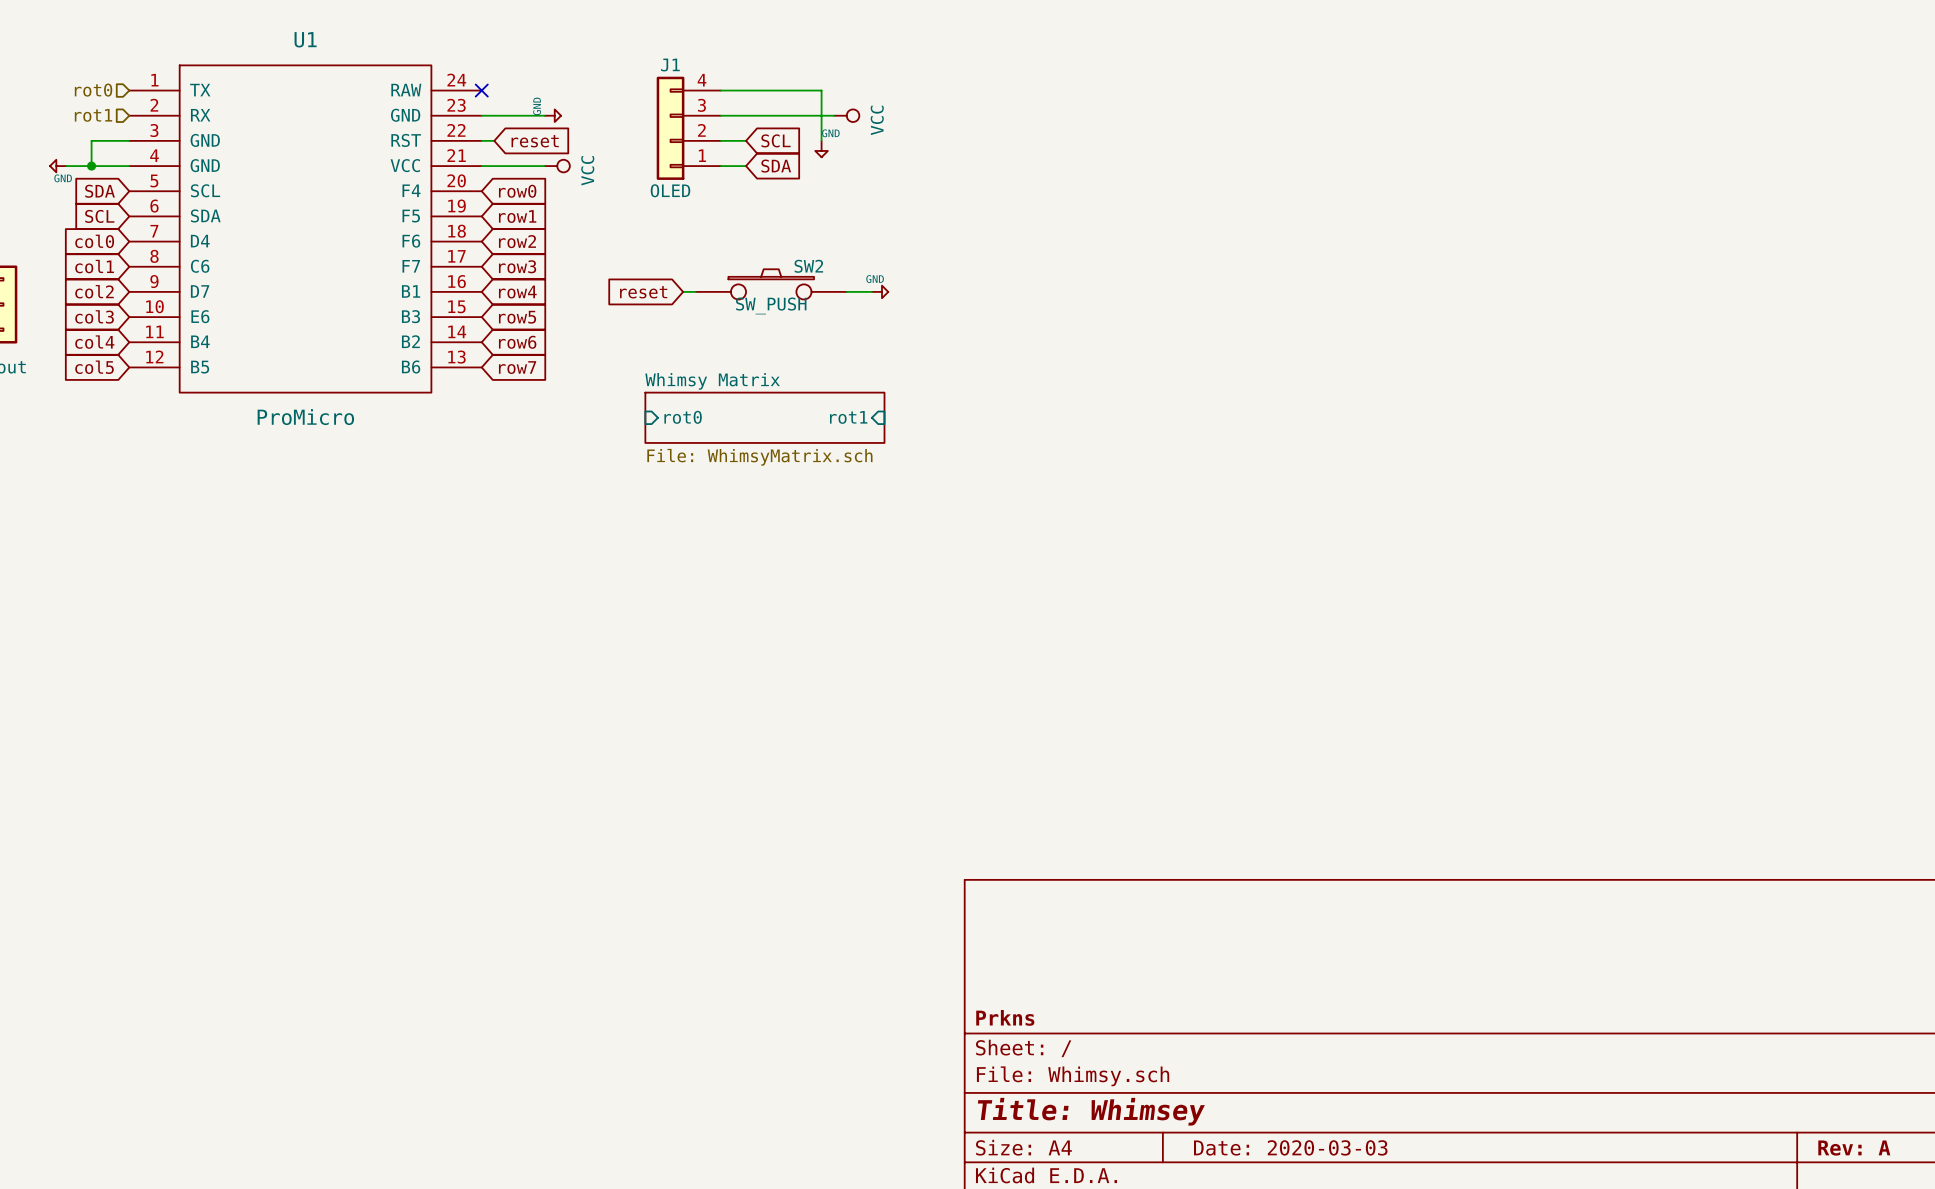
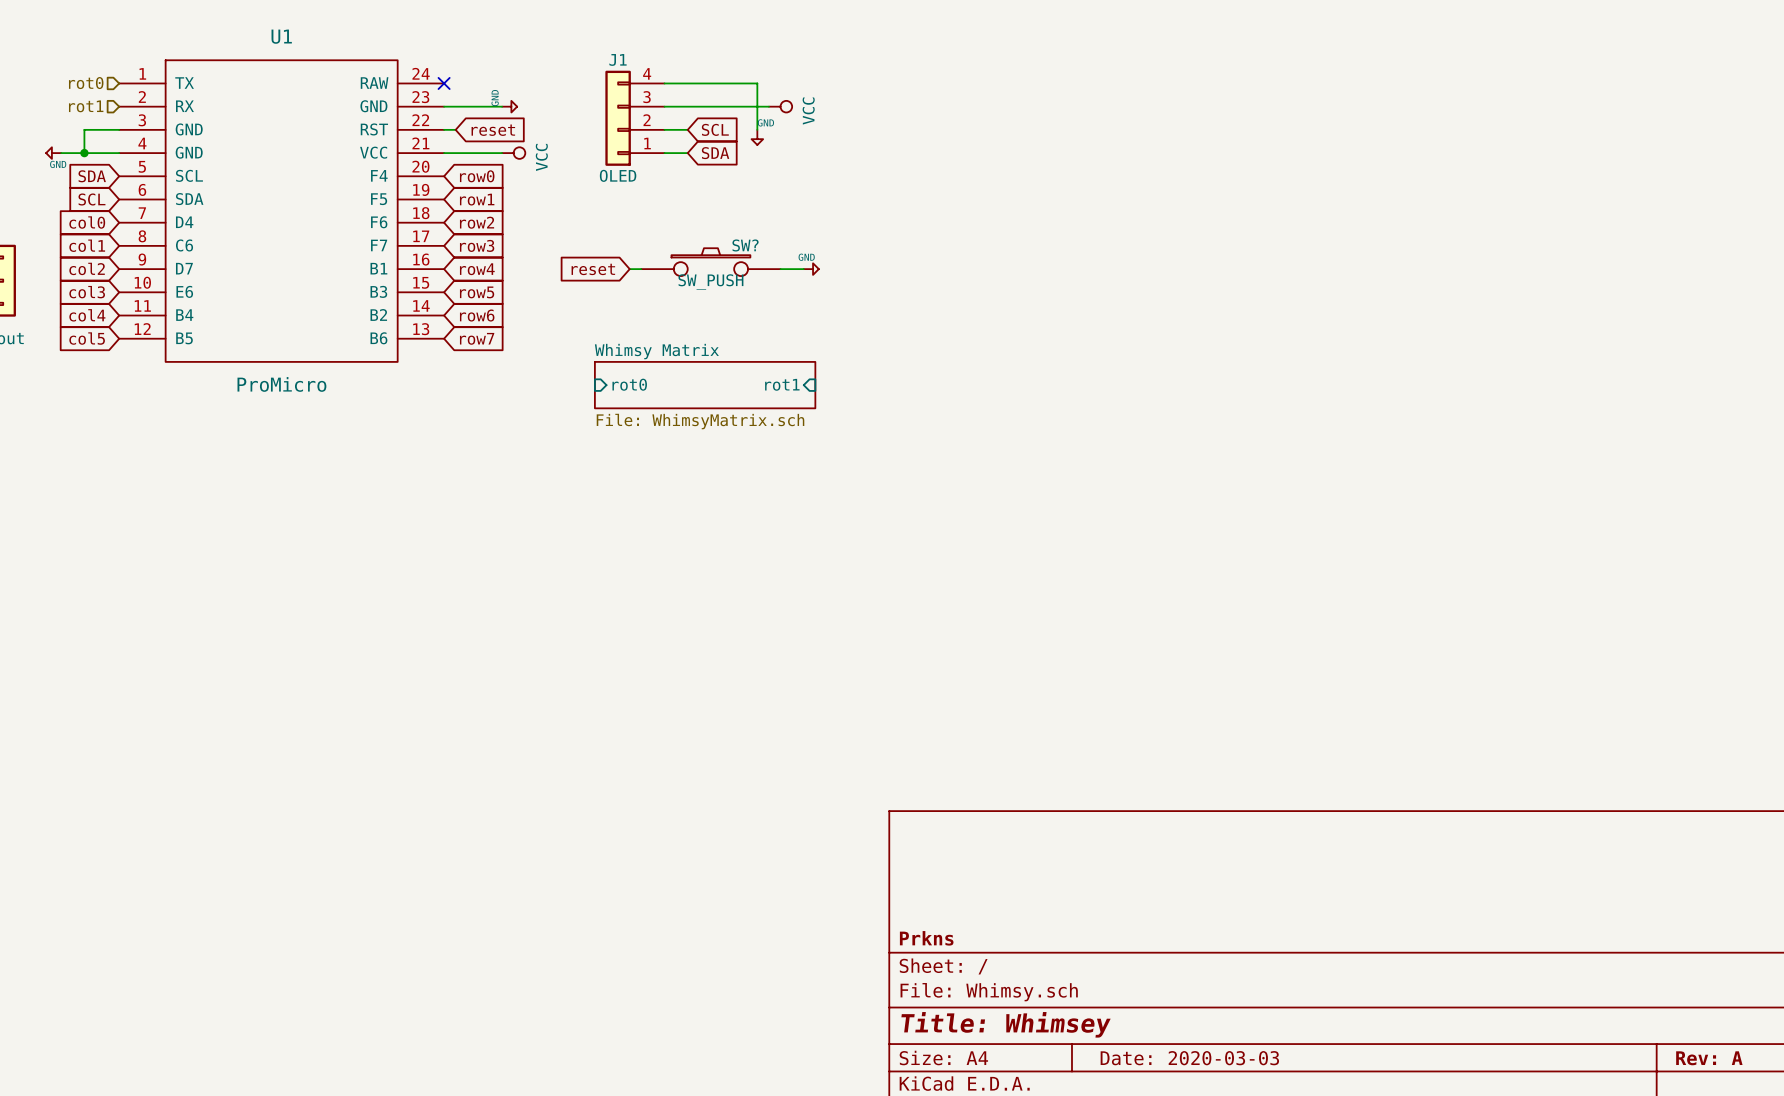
SW2 name: SW2 (808, 266) -> SW? (745, 245)

